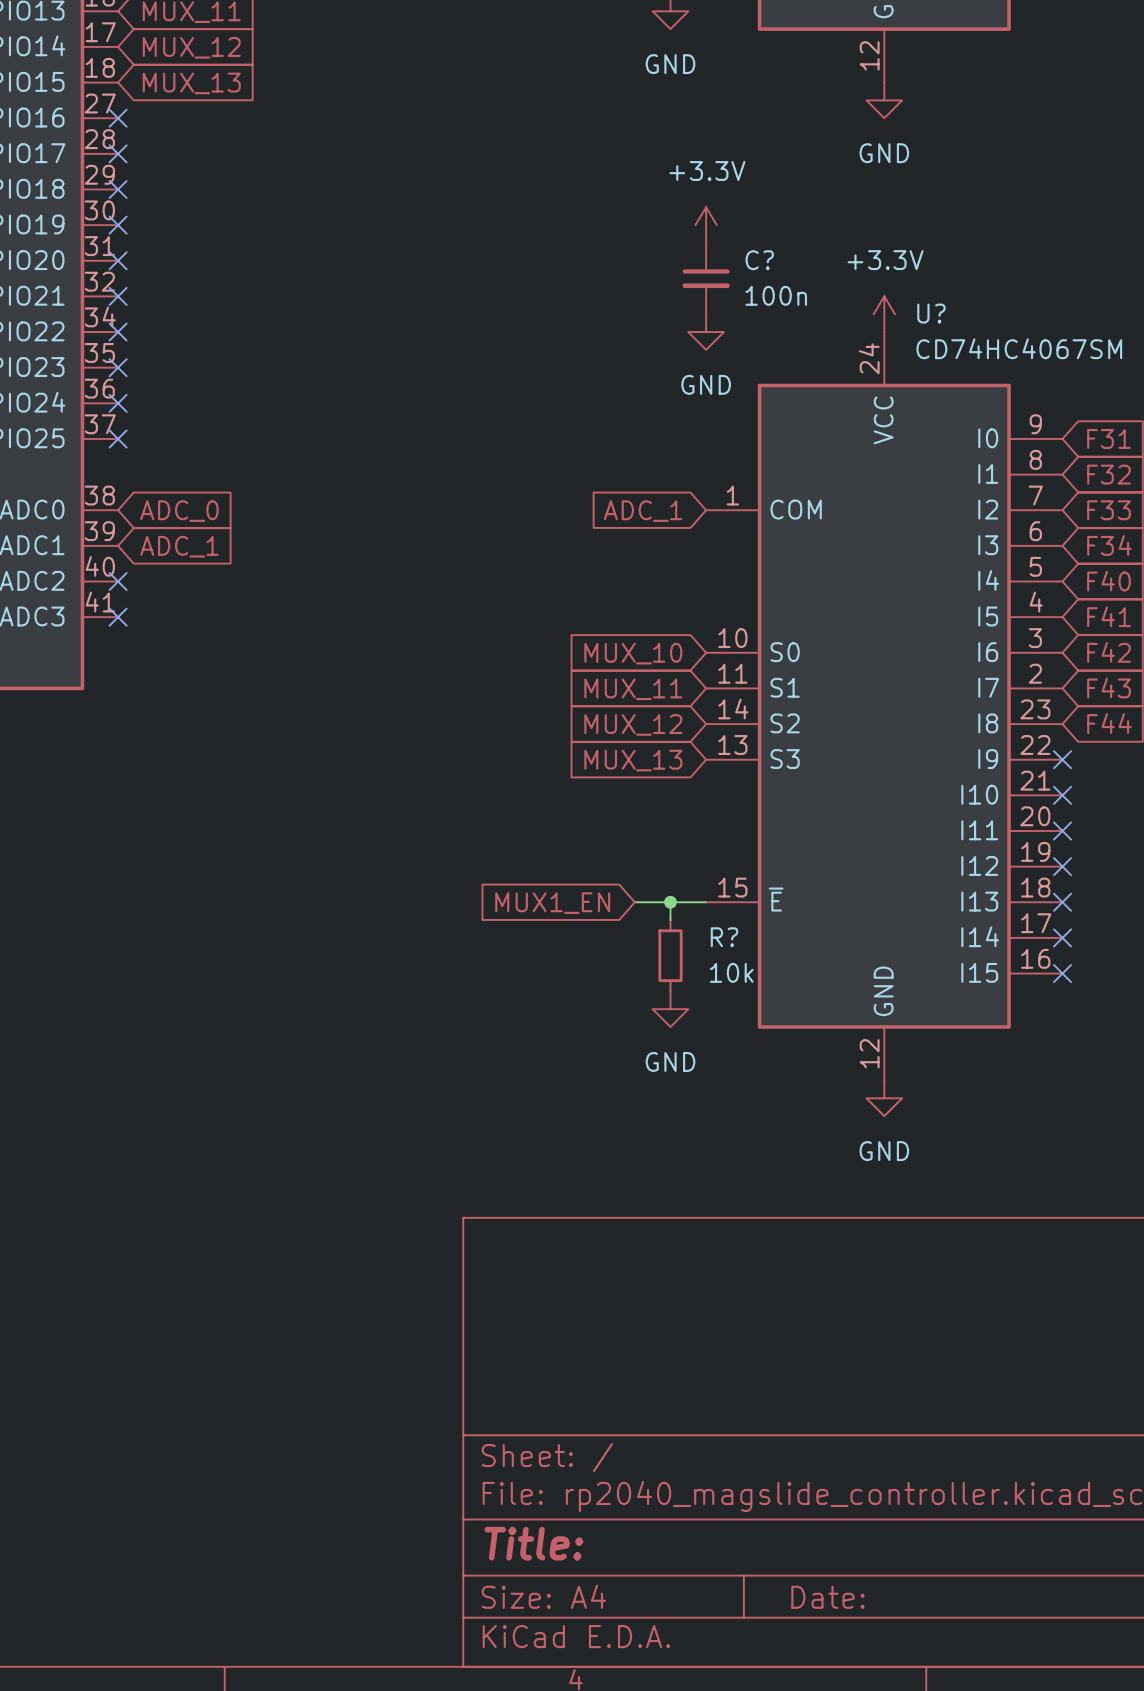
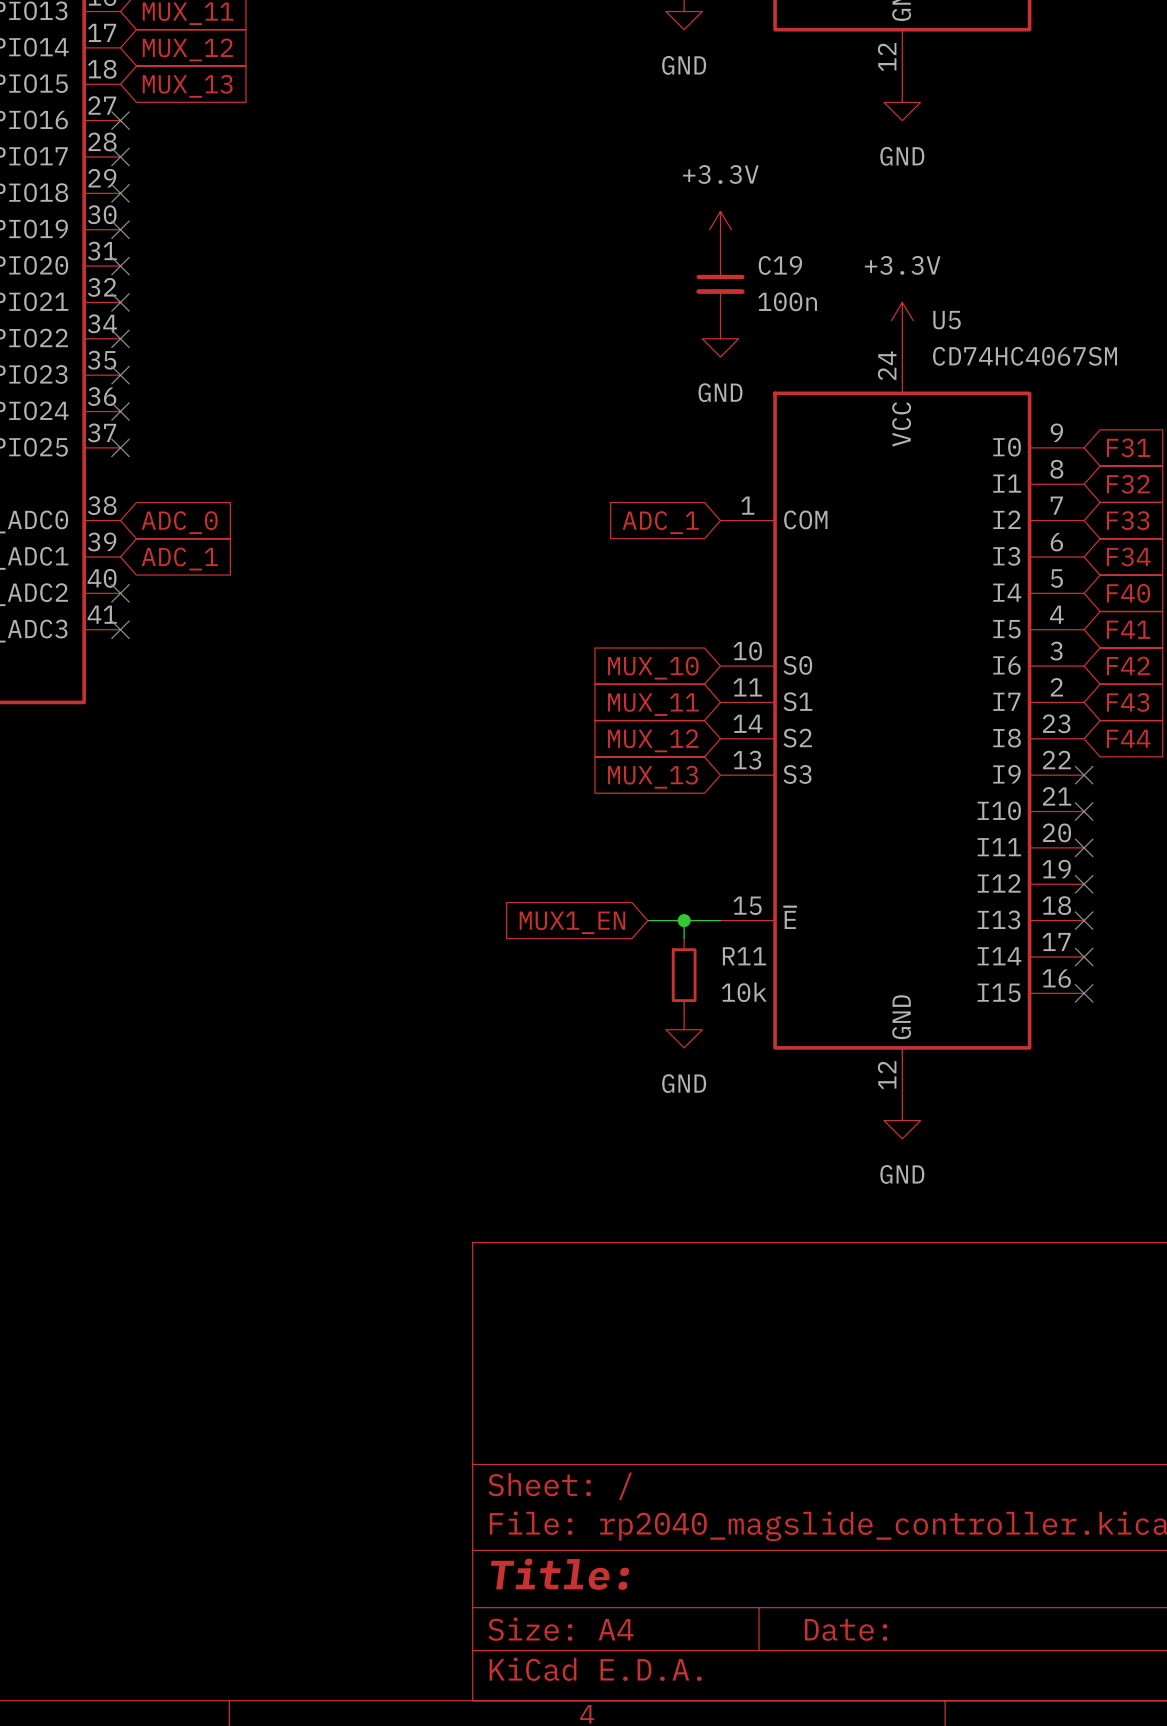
C? name: C? (759, 260) -> C19 (780, 265)
U? name: U? (931, 313) -> U5 (947, 320)
R? name: R? (724, 937) -> R11 (744, 956)

